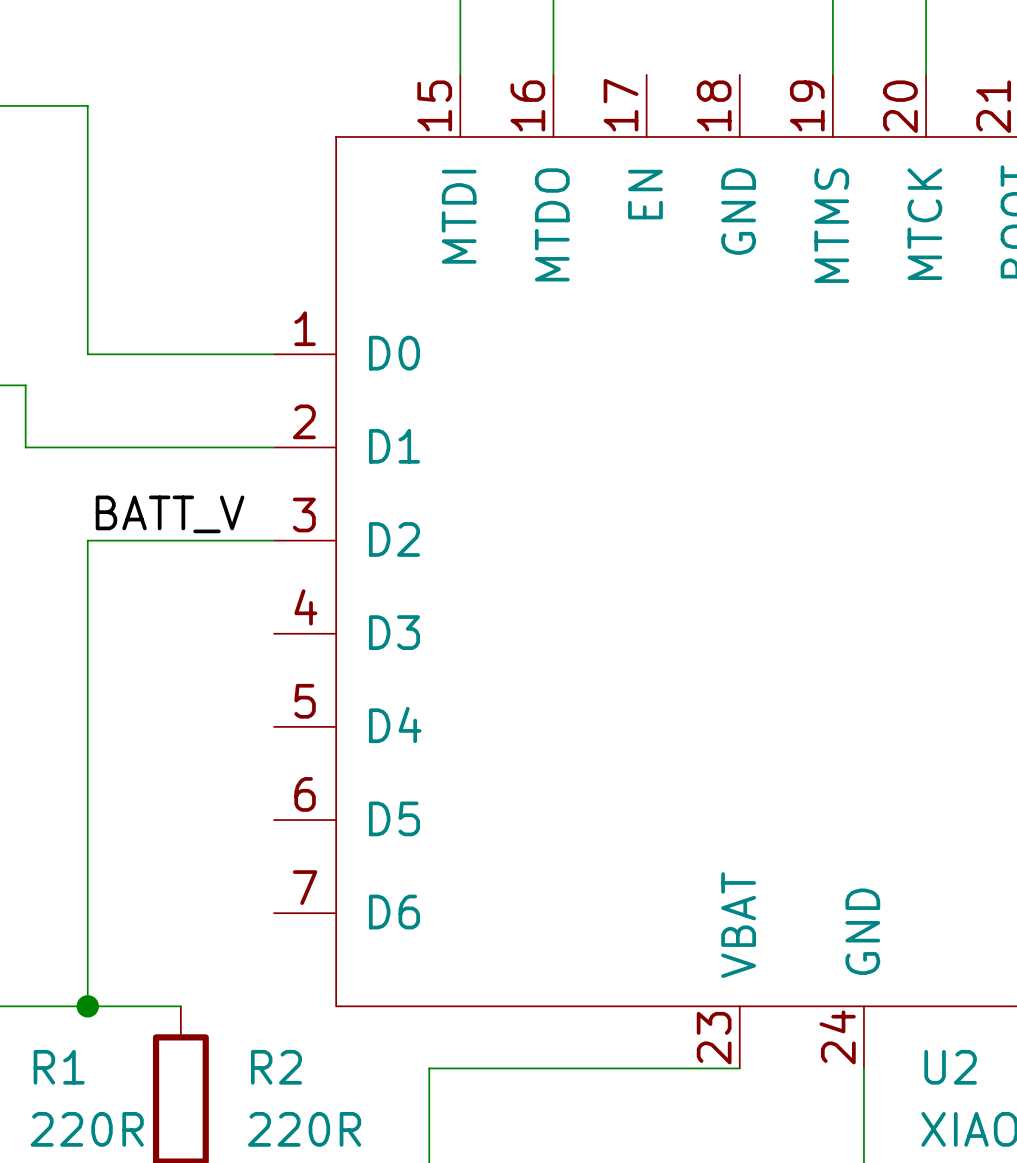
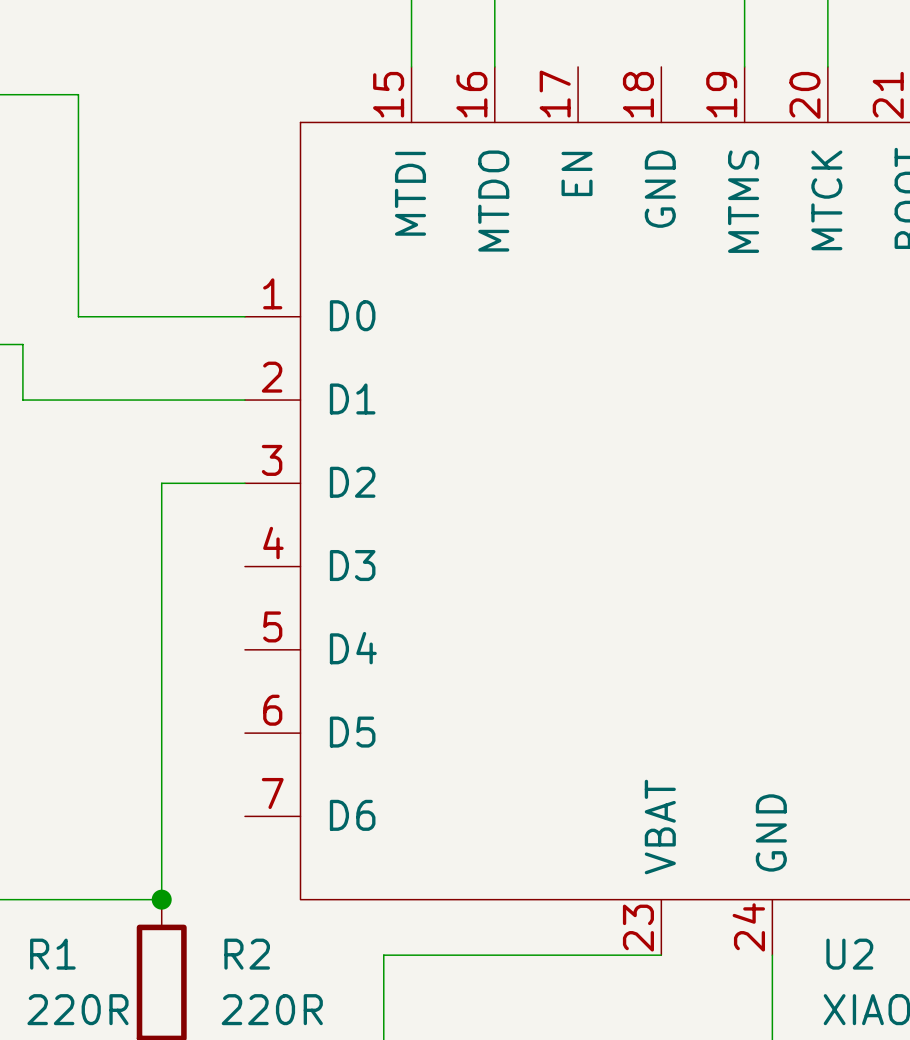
label: BATT_V (170, 514) -> none
wire: (180, 540) (87, 540) (87, 1006) -> (161, 483) (161, 899)
junction position: (87, 1006) -> (161, 899)

